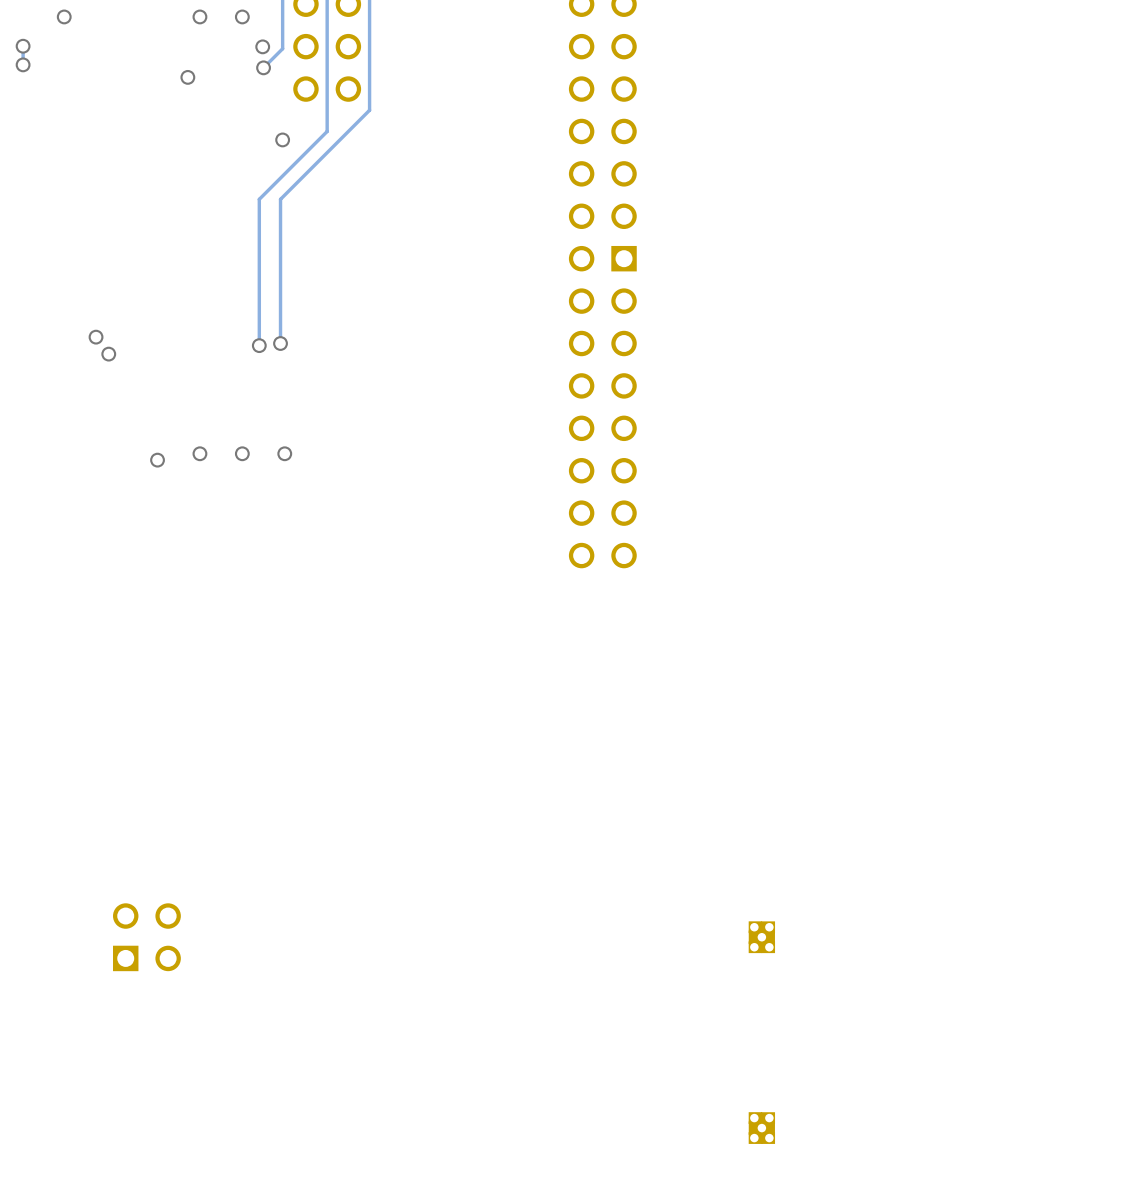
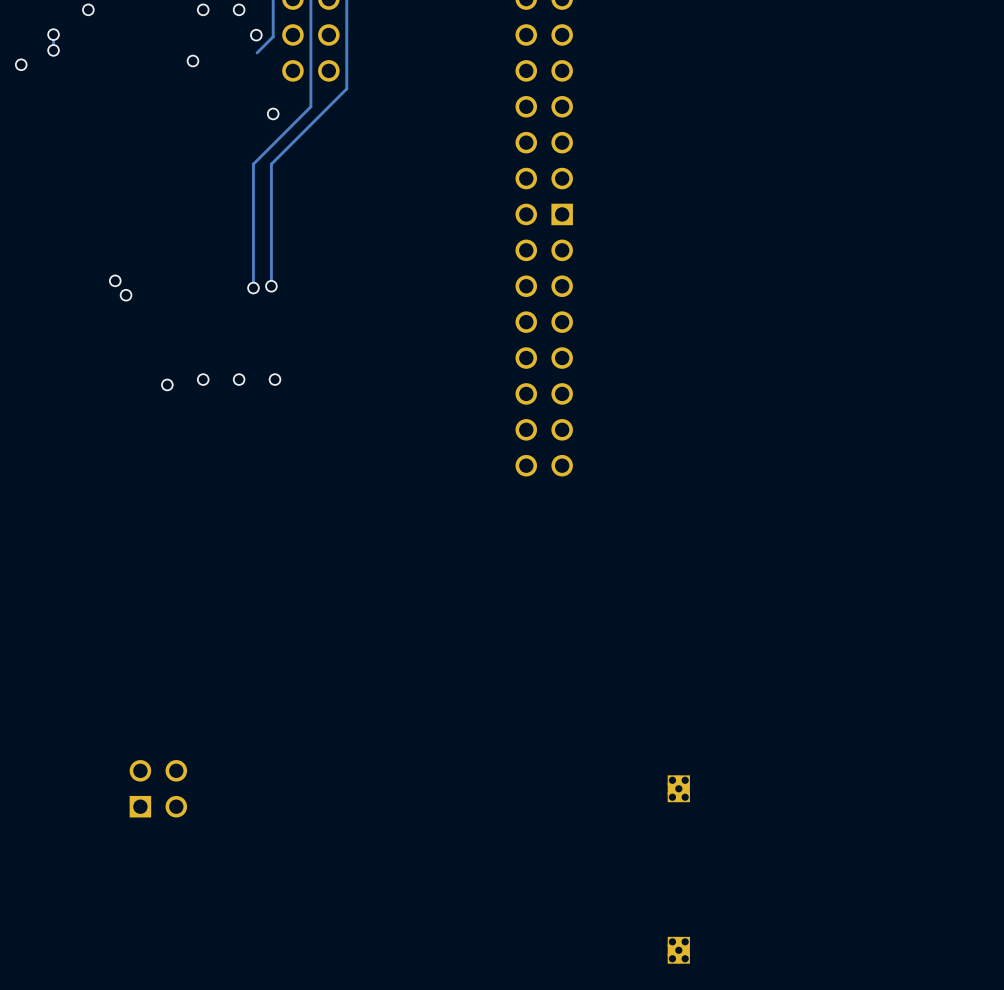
via: (263, 67) -> none

